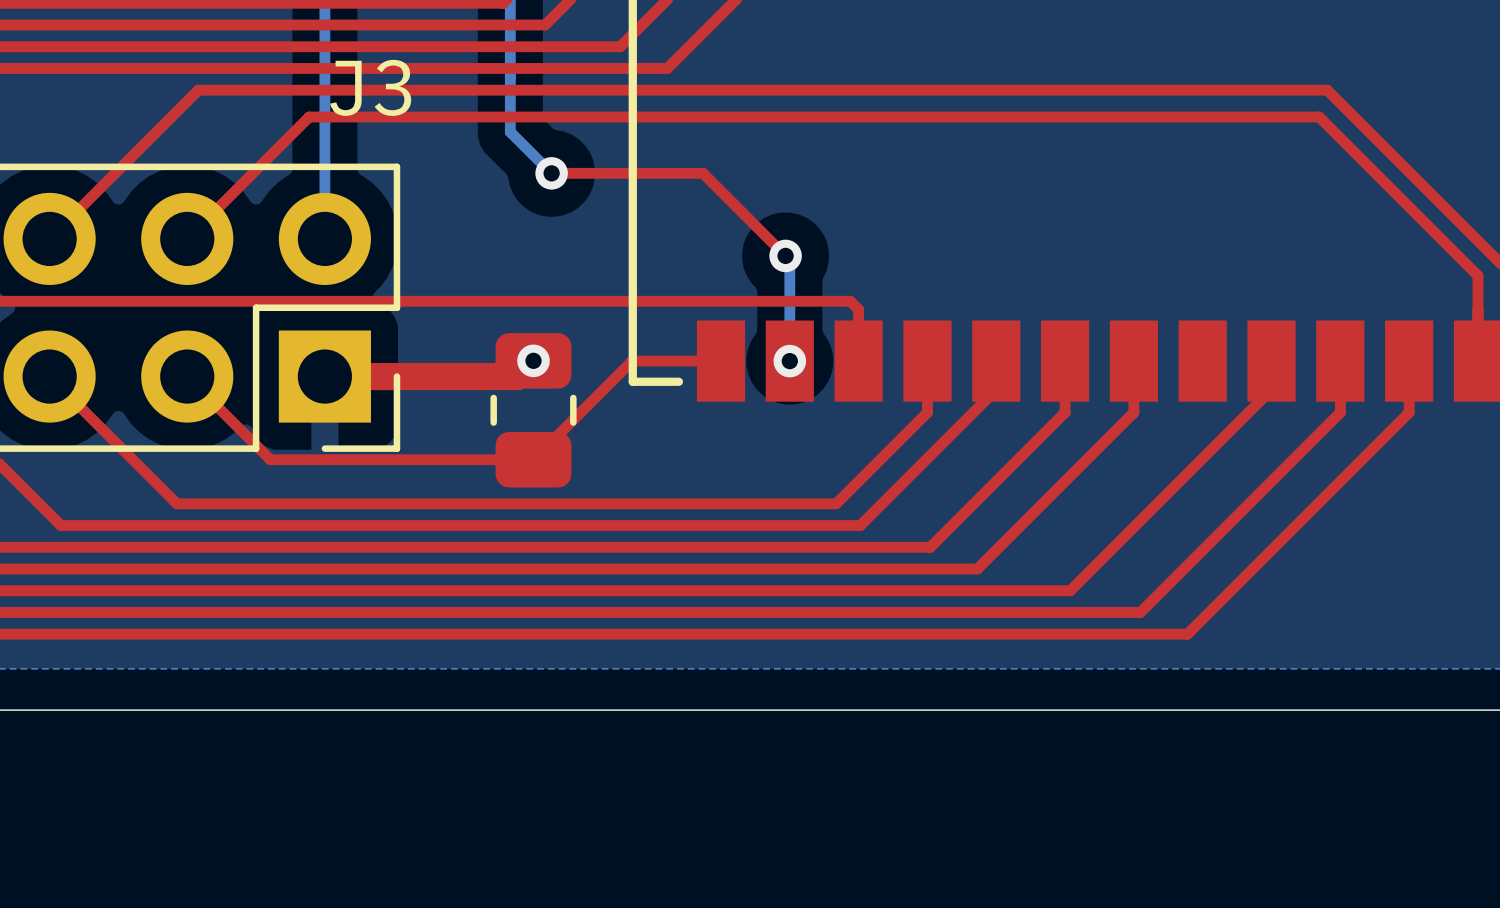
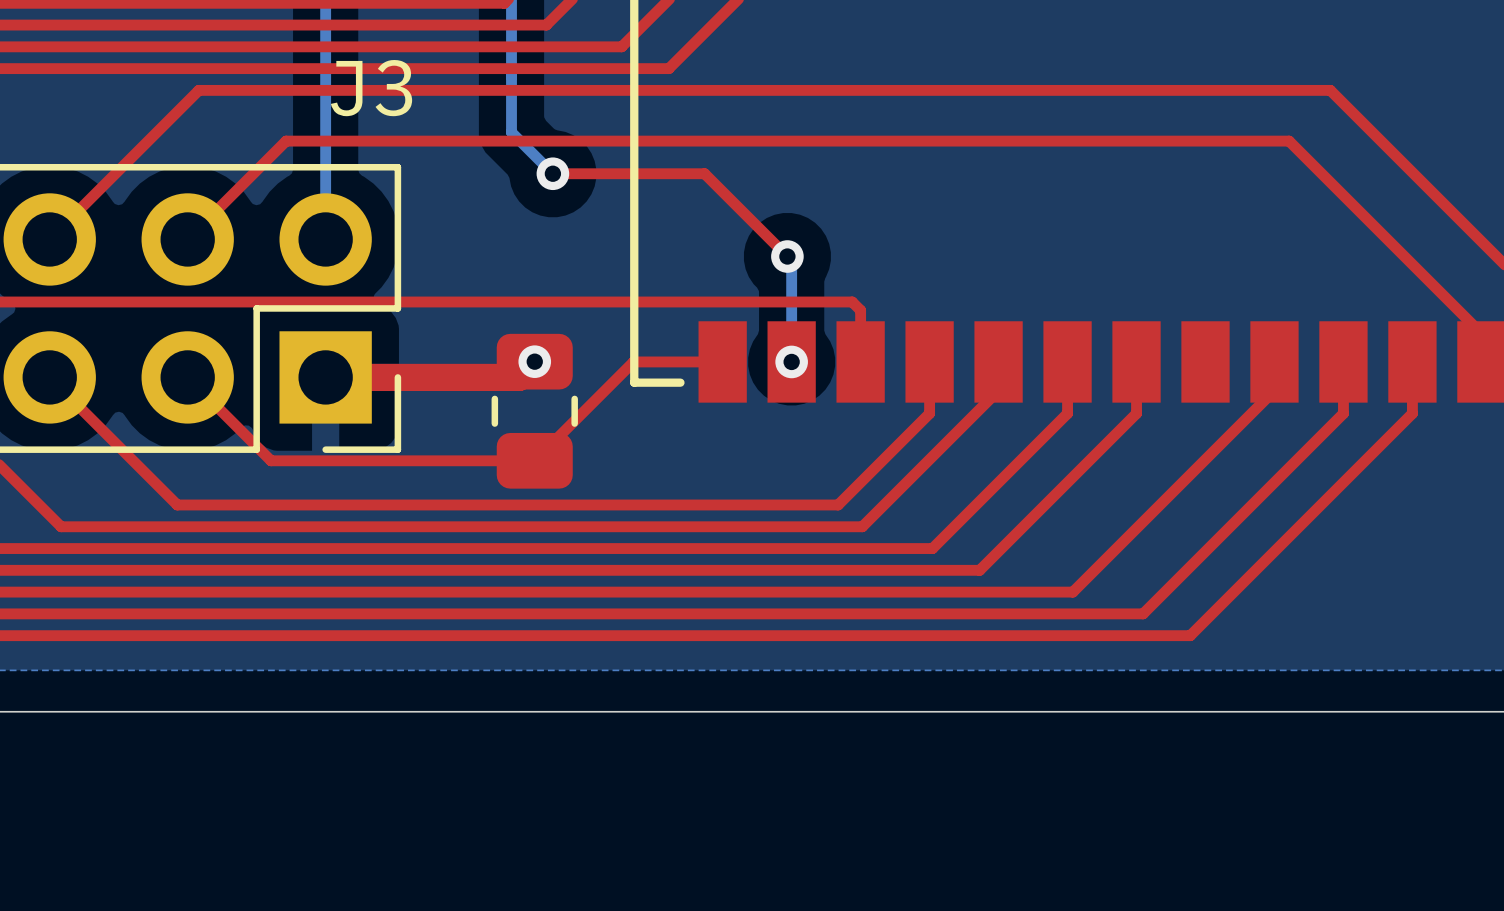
top track: (285, 140) (309, 117) (1319, 117) (1477, 275) (1477, 332) -> (286, 141) (1289, 141) (1481, 333)

